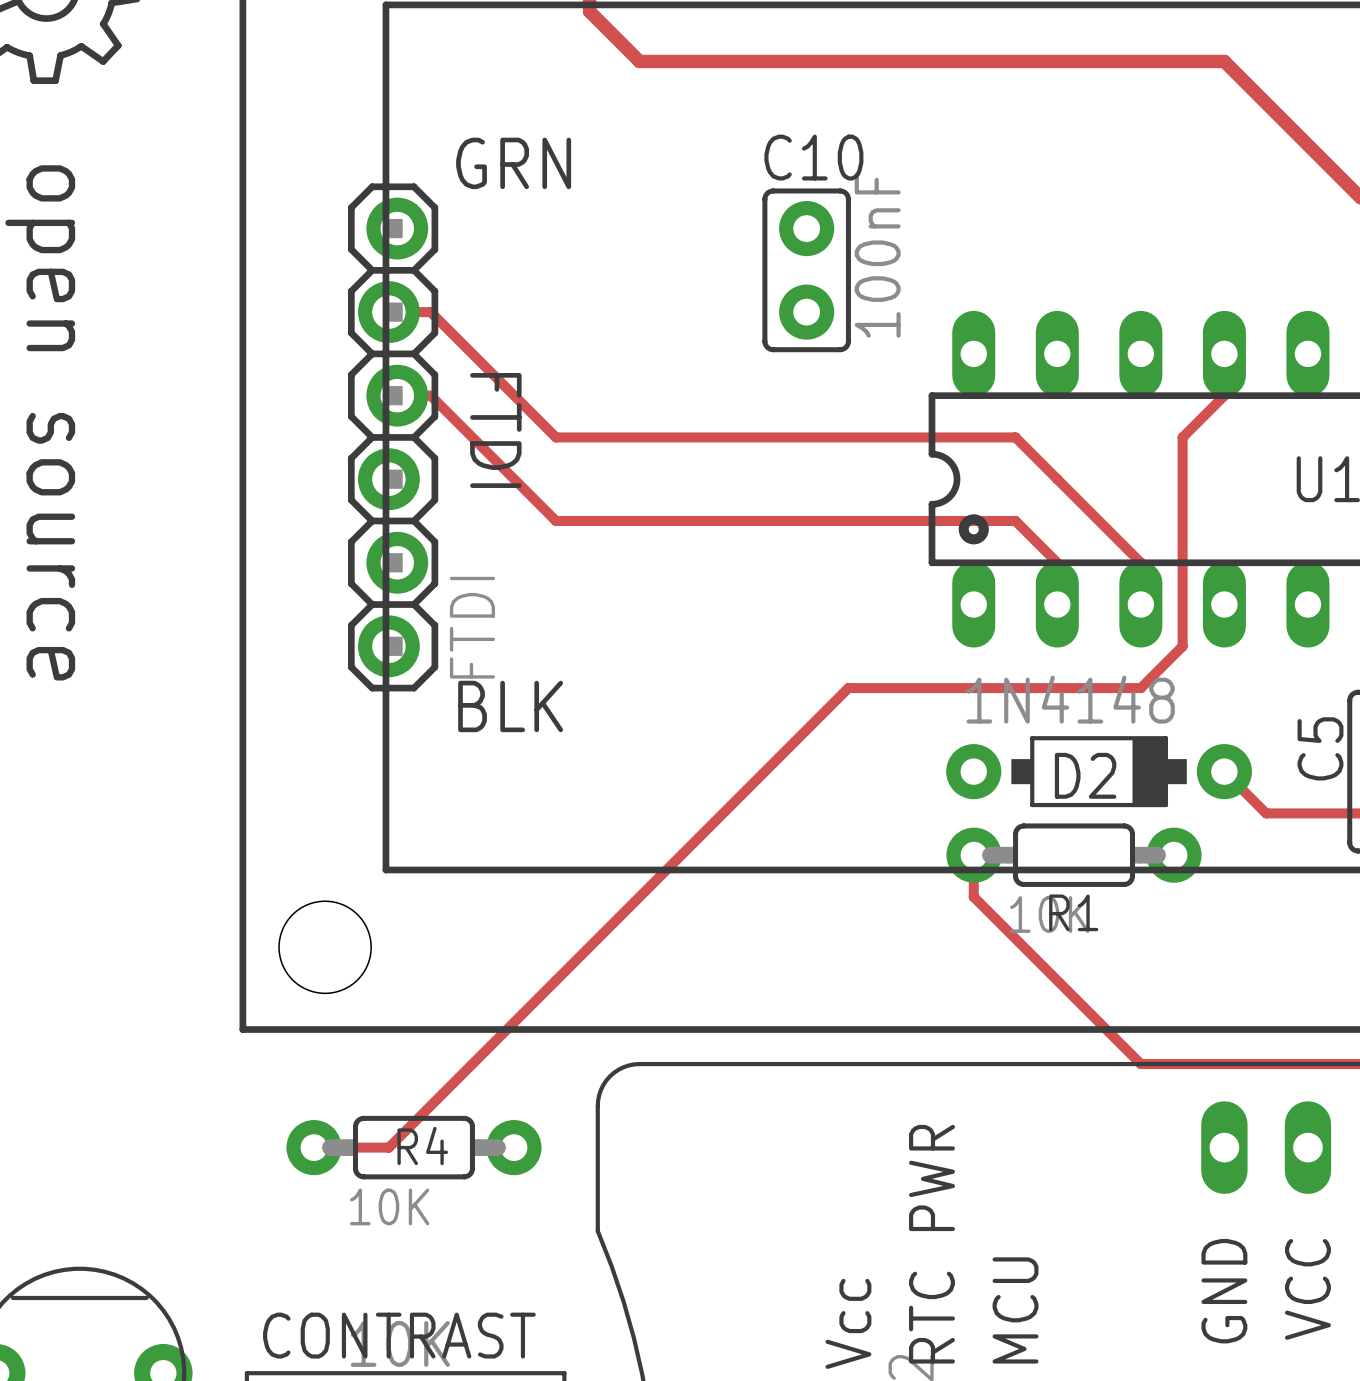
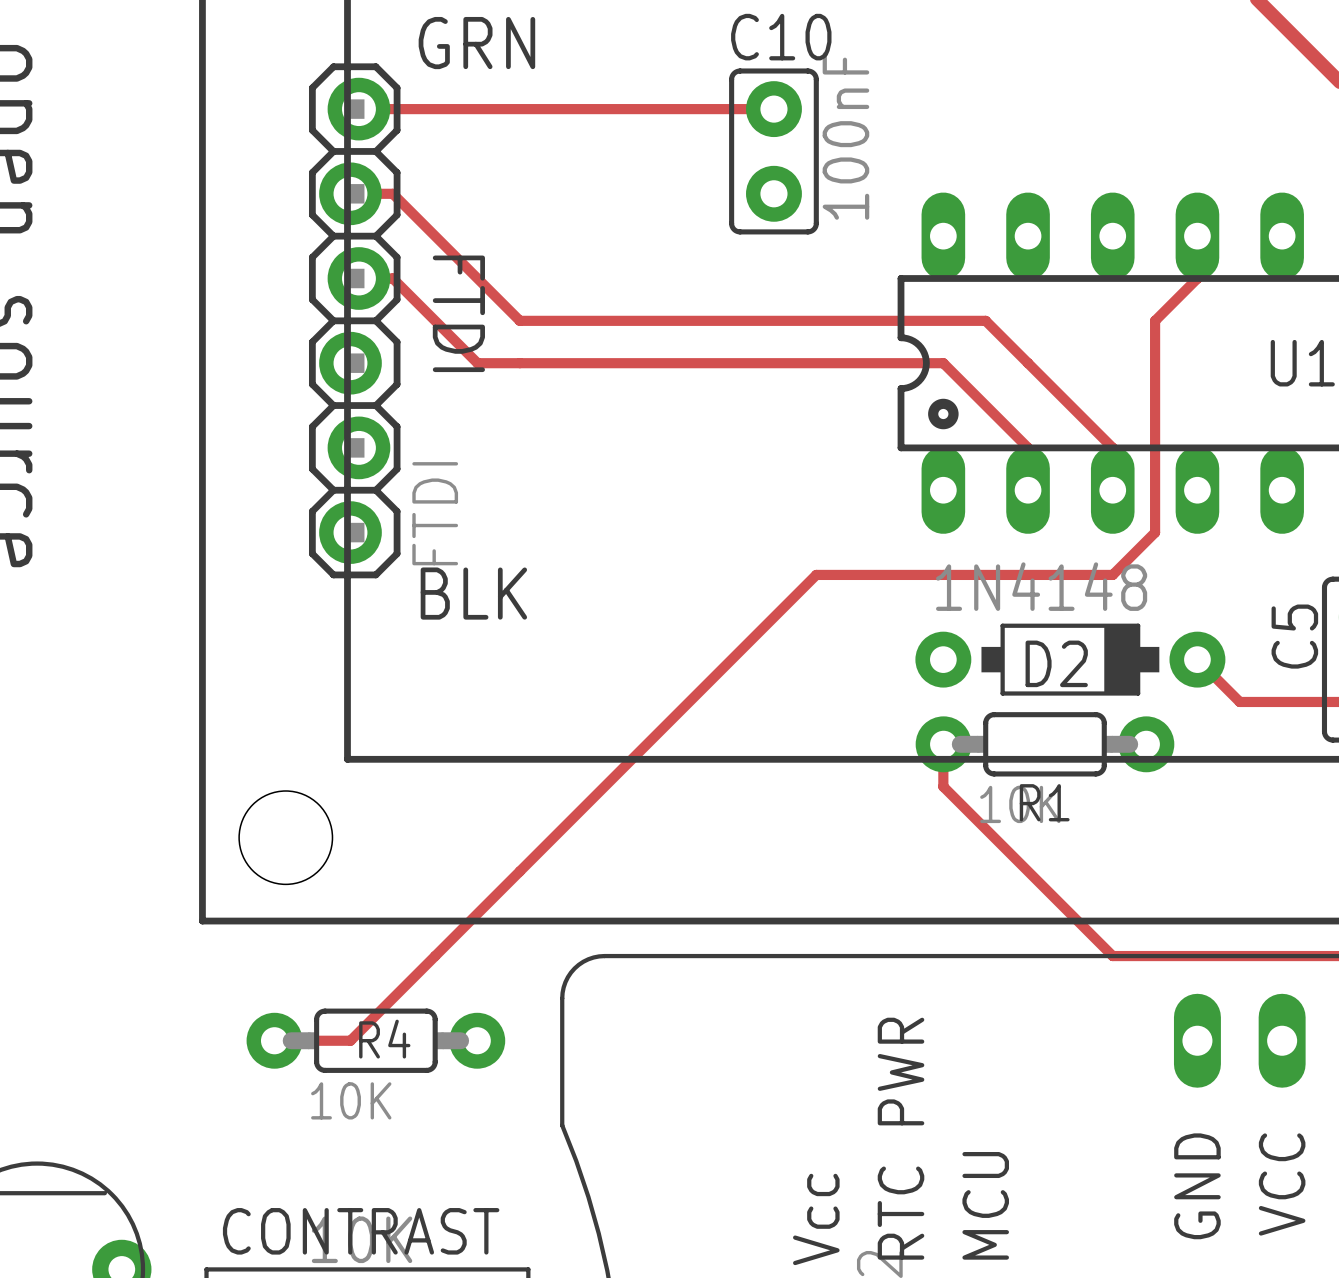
track: none -> (358, 109) (773, 109)
track: (514, 479) (556, 520) (1015, 520) -> (477, 363) (943, 363) (985, 405)

